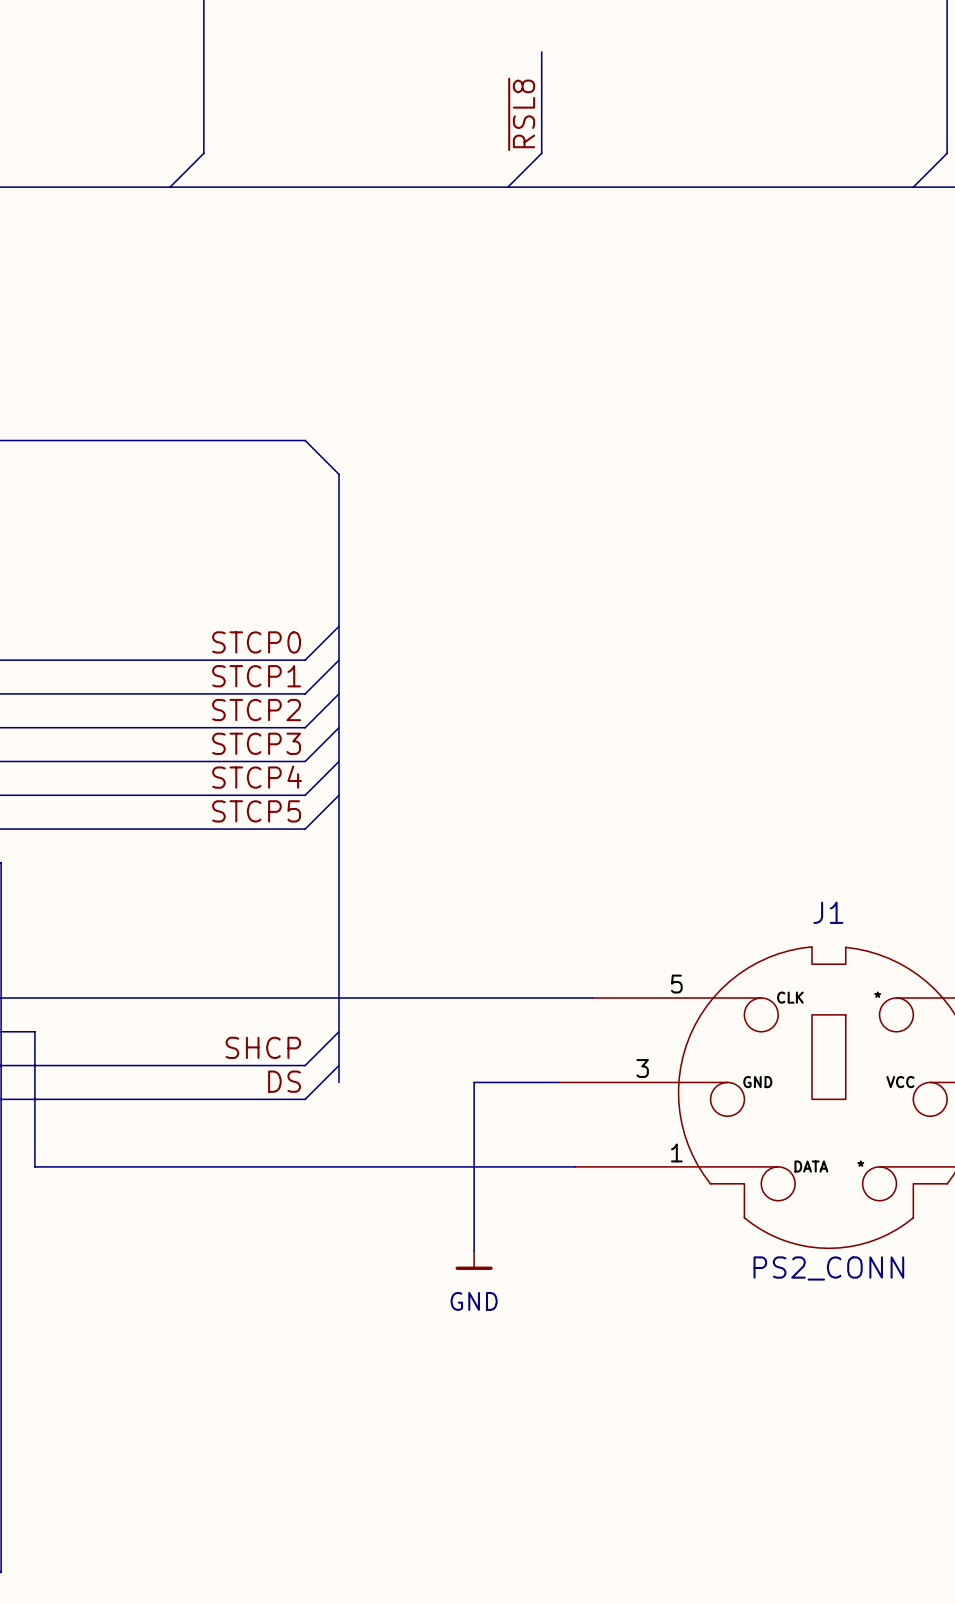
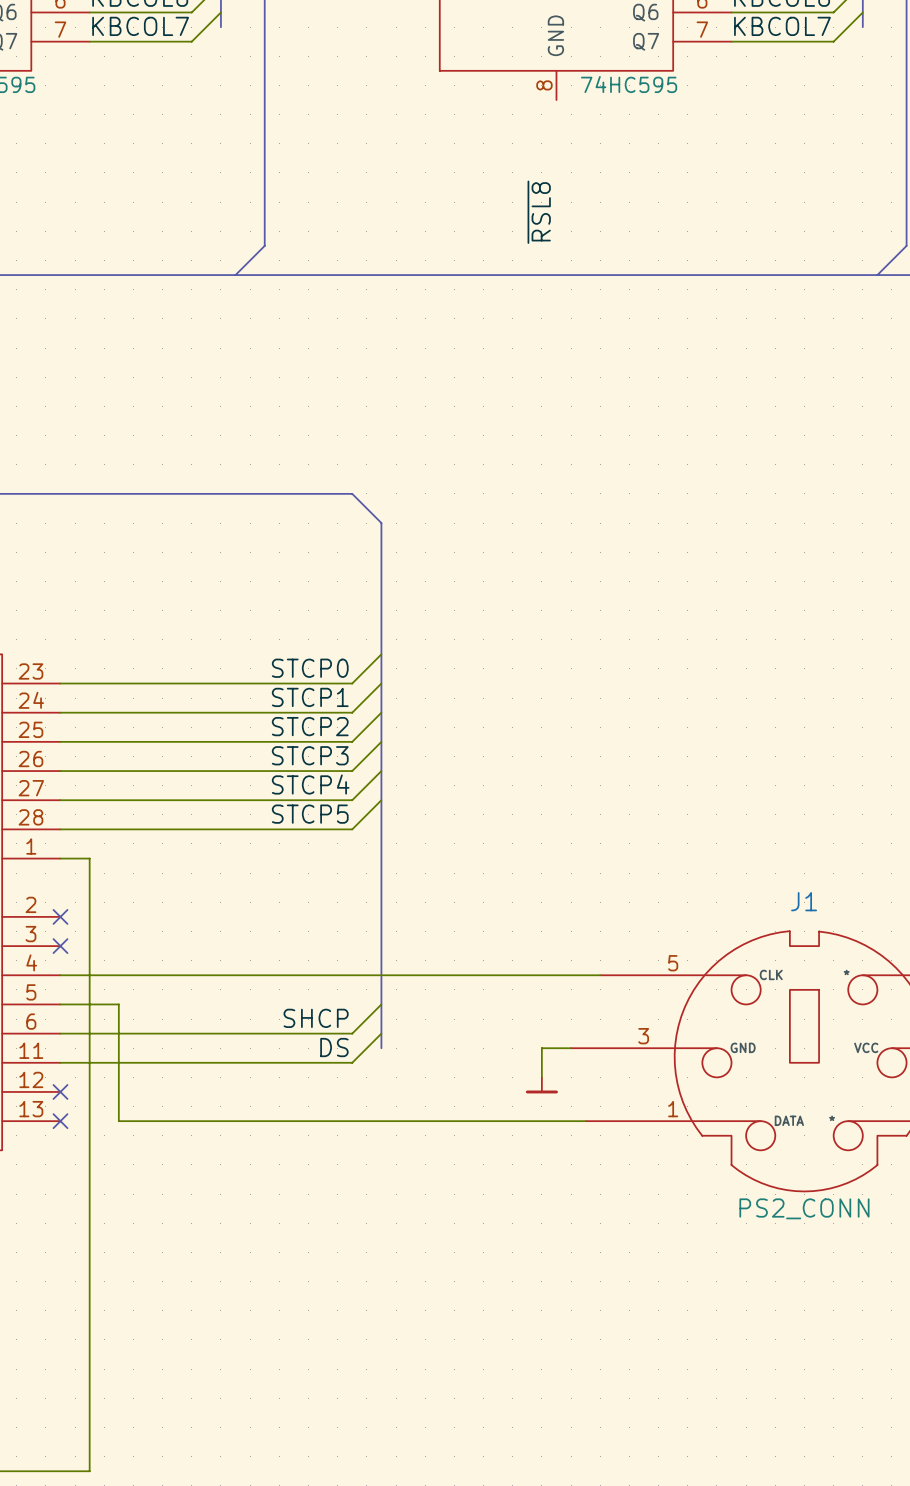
wire: (541, 52) (541, 153) (507, 187) -> none
wire: (524, 1082) (474, 1082) (474, 1251) -> (541, 1048) (541, 1077)
power symbol: none -> (541, 1085)
power symbol: GND (474, 1260) -> none

